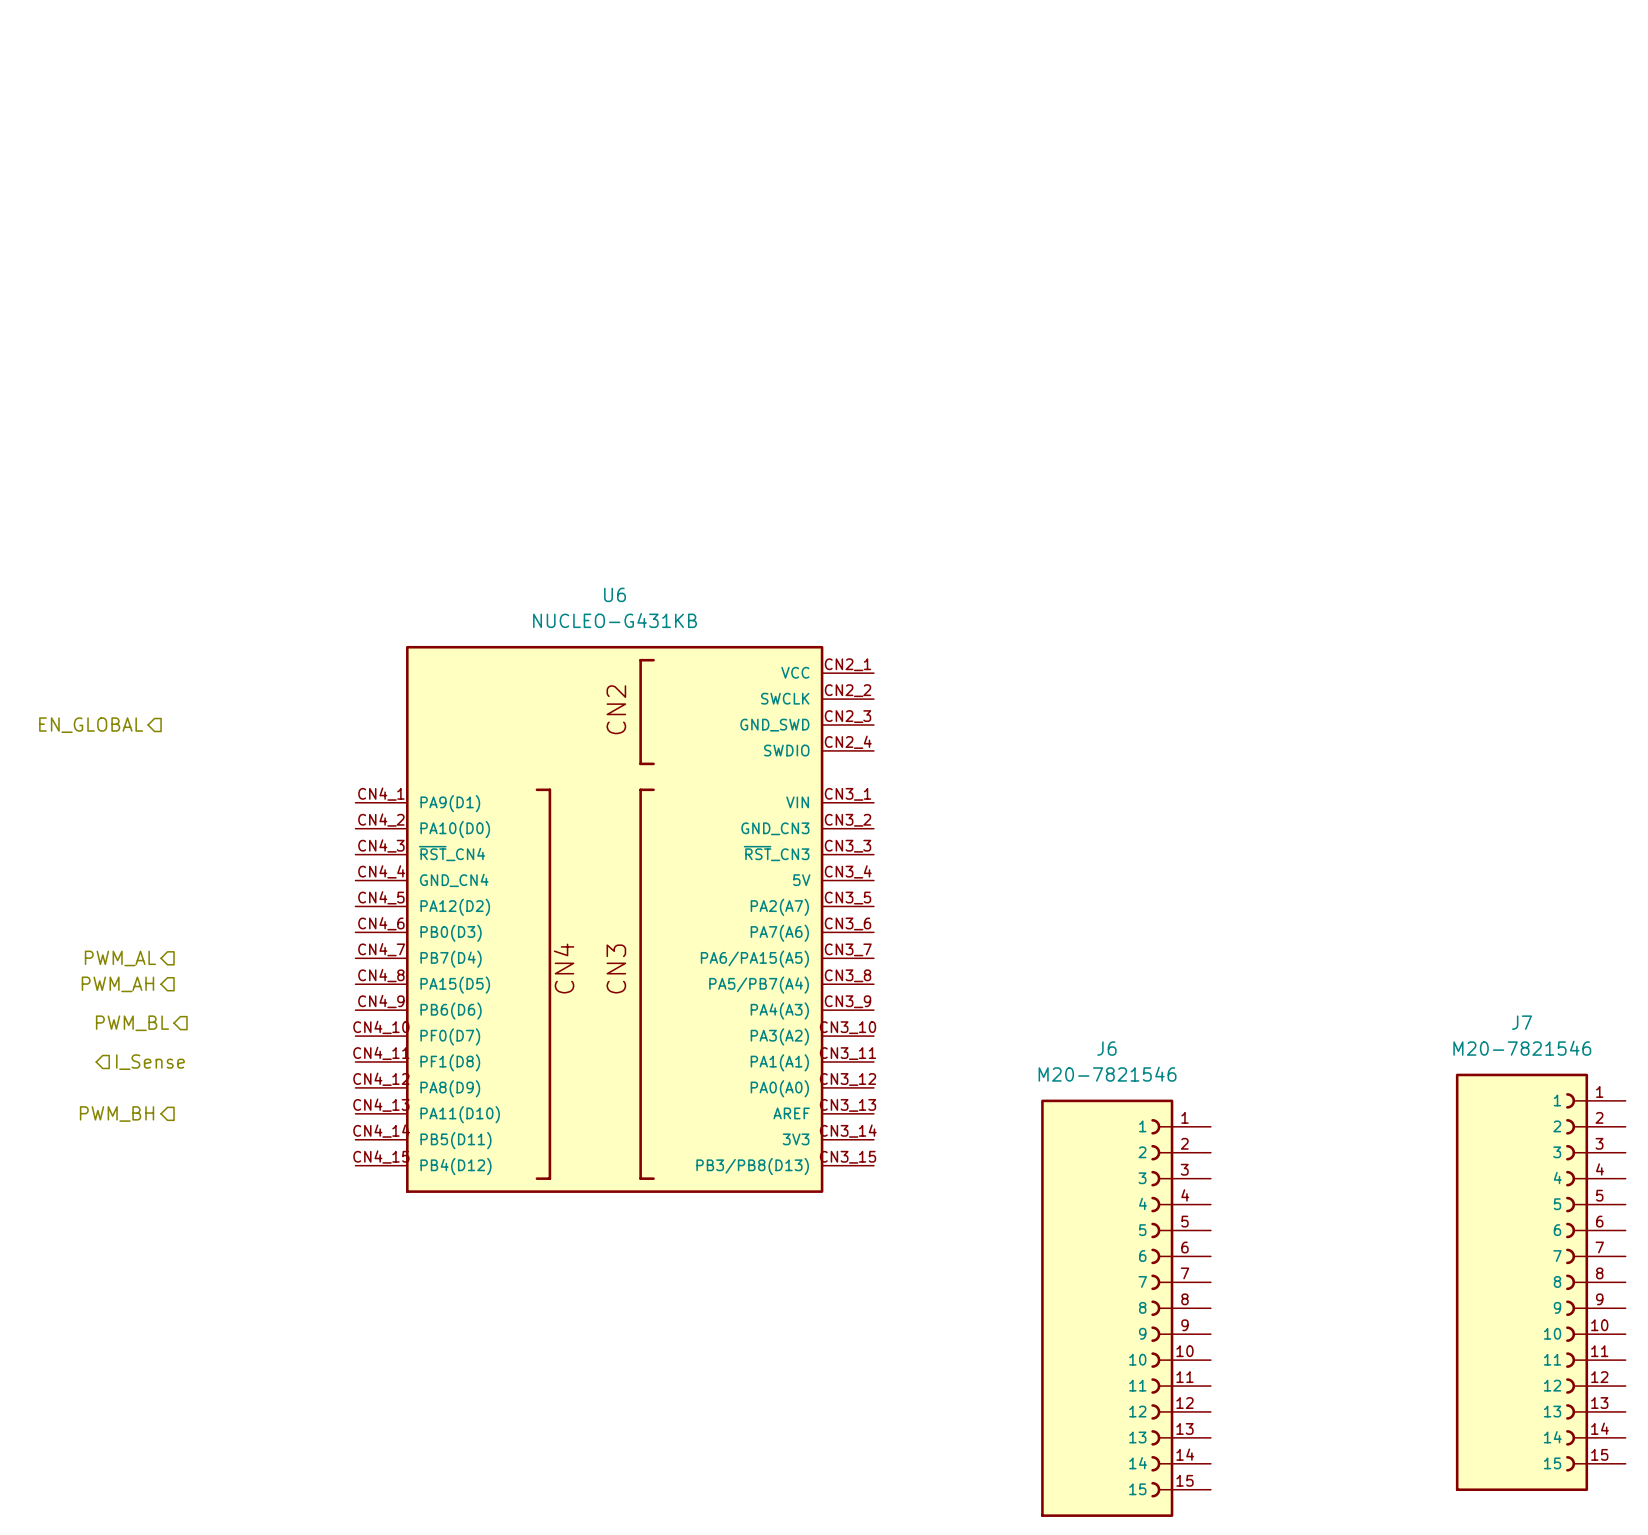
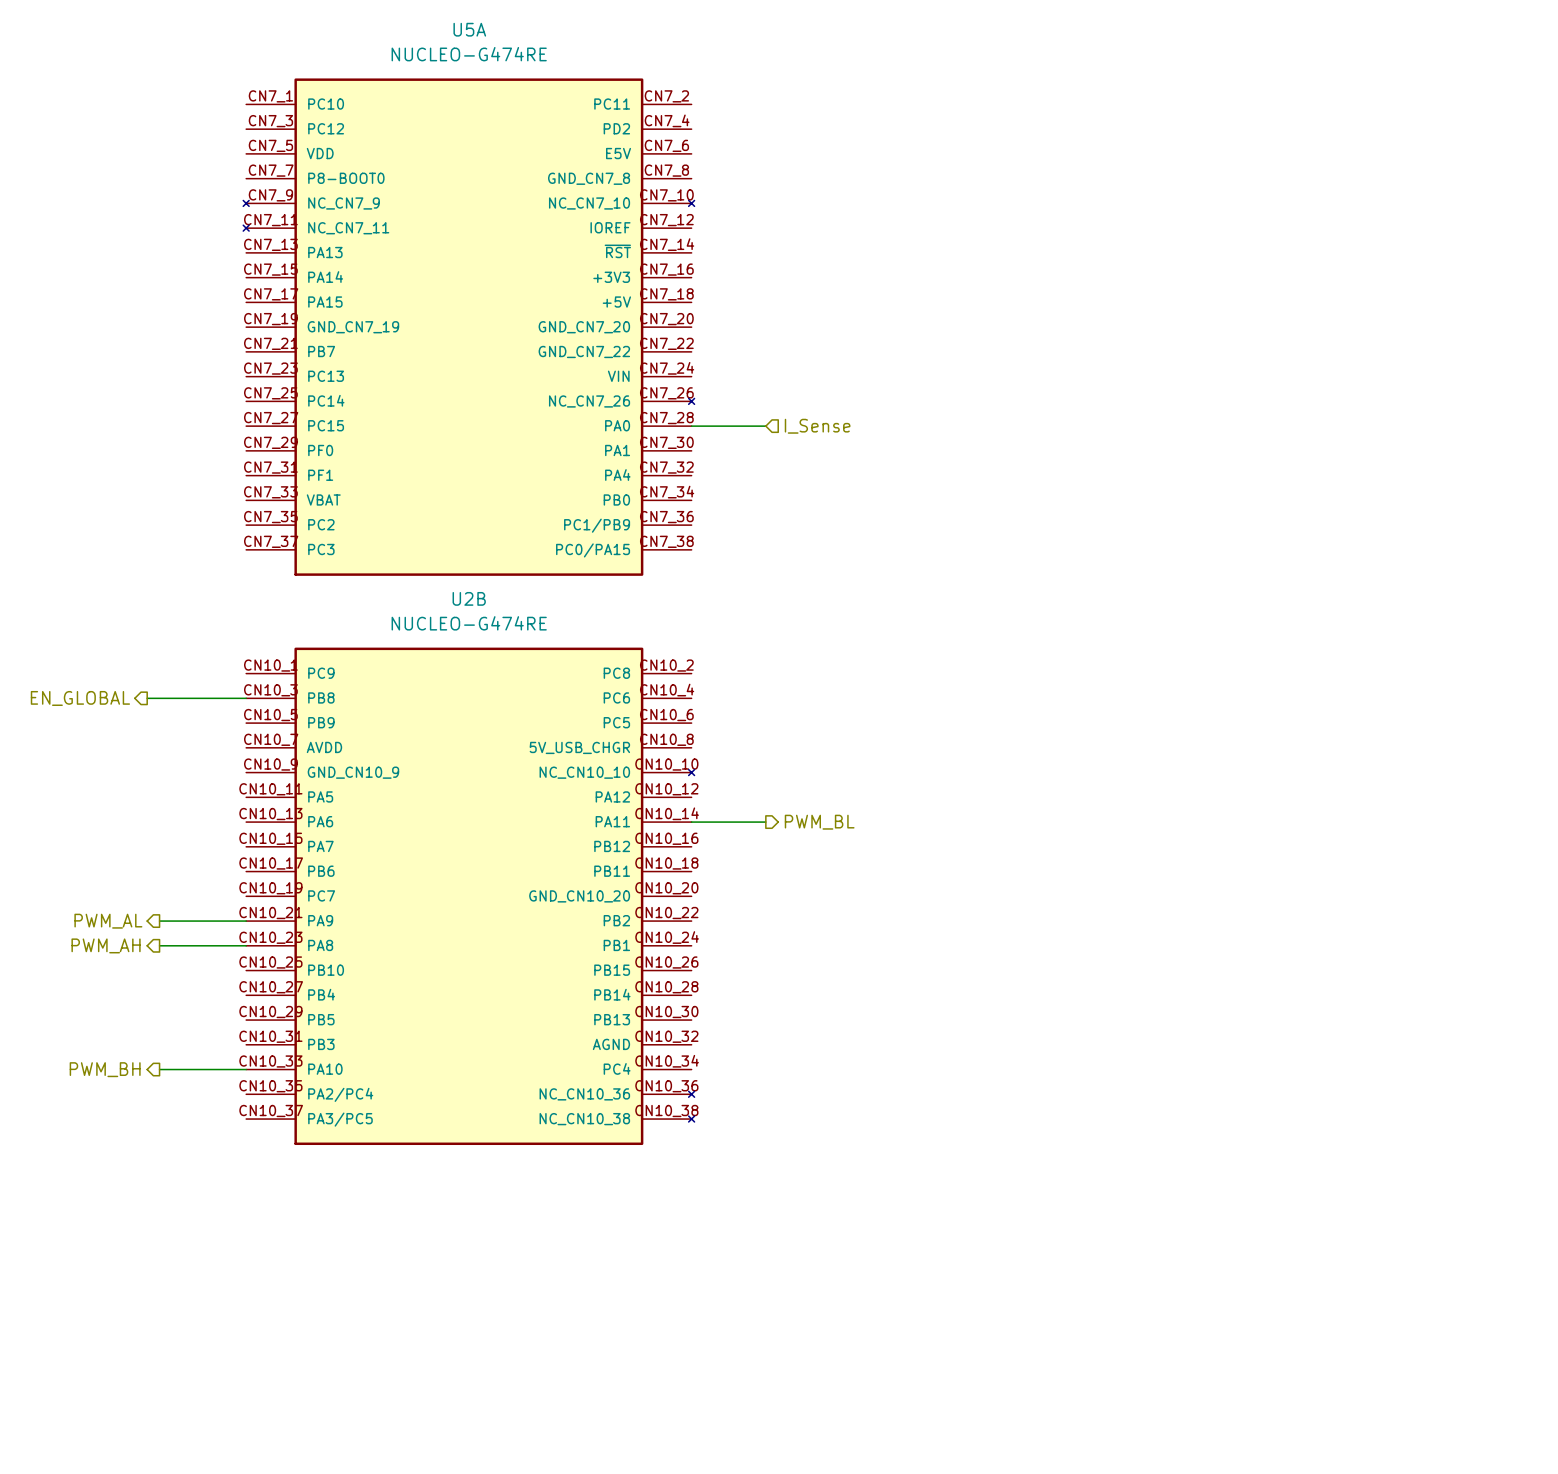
U5A: none -> NUCLEO-G474RE (468, 327)
wire: none -> (691, 426) (765, 426)
hierarchical label: none -> I_Sense (817, 426)
wire: none -> (147, 698) (246, 698)
hierarchical label: none -> PWM_BL (819, 822)
U6: NUCLEO-G431KB (614, 919) -> none
U2B: none -> NUCLEO-G474RE (470, 896)
wire: none -> (159, 921) (246, 921)
wire: none -> (159, 945) (246, 945)
hierarchical label: PWM_BL (132, 1023) -> none
hierarchical label: I_Sense (150, 1062) -> none
wire: none -> (159, 1069) (246, 1069)
J7: M20-7821546 (1540, 1282) -> none
J6: M20-7821546 (1126, 1308) -> none

